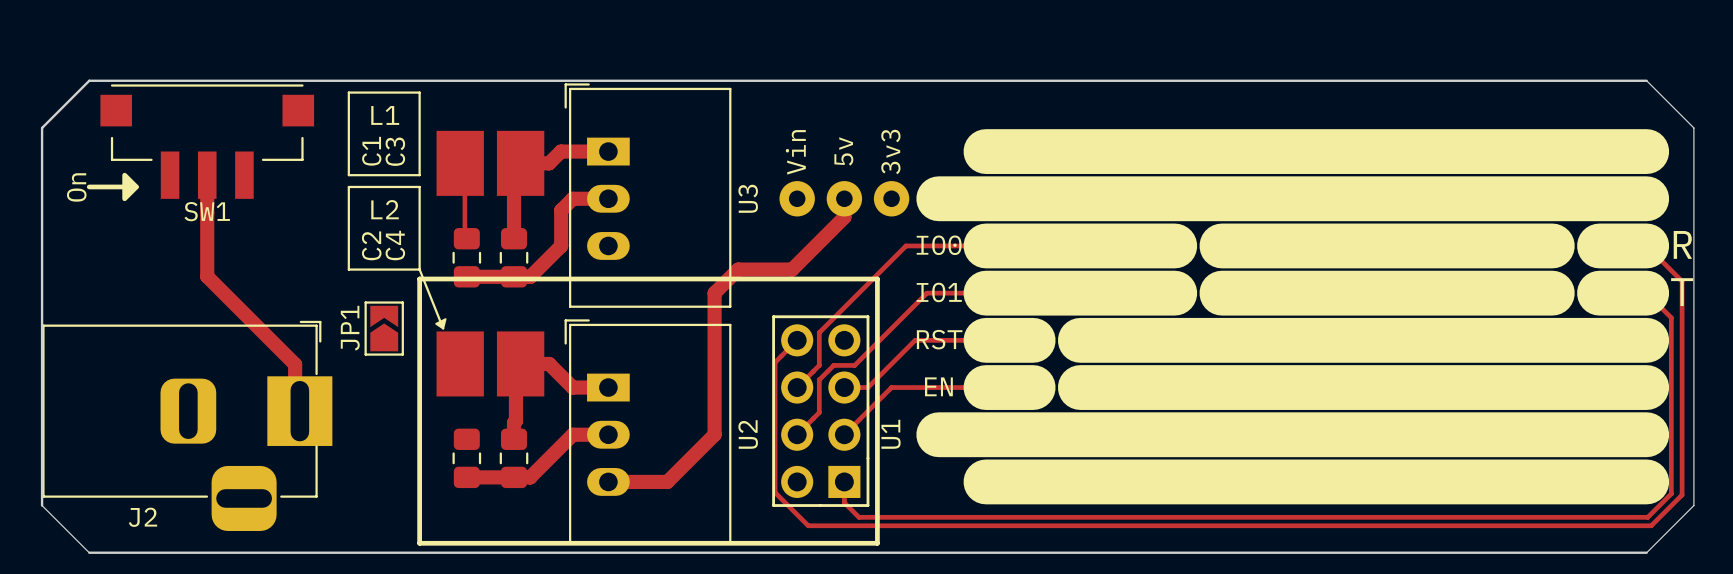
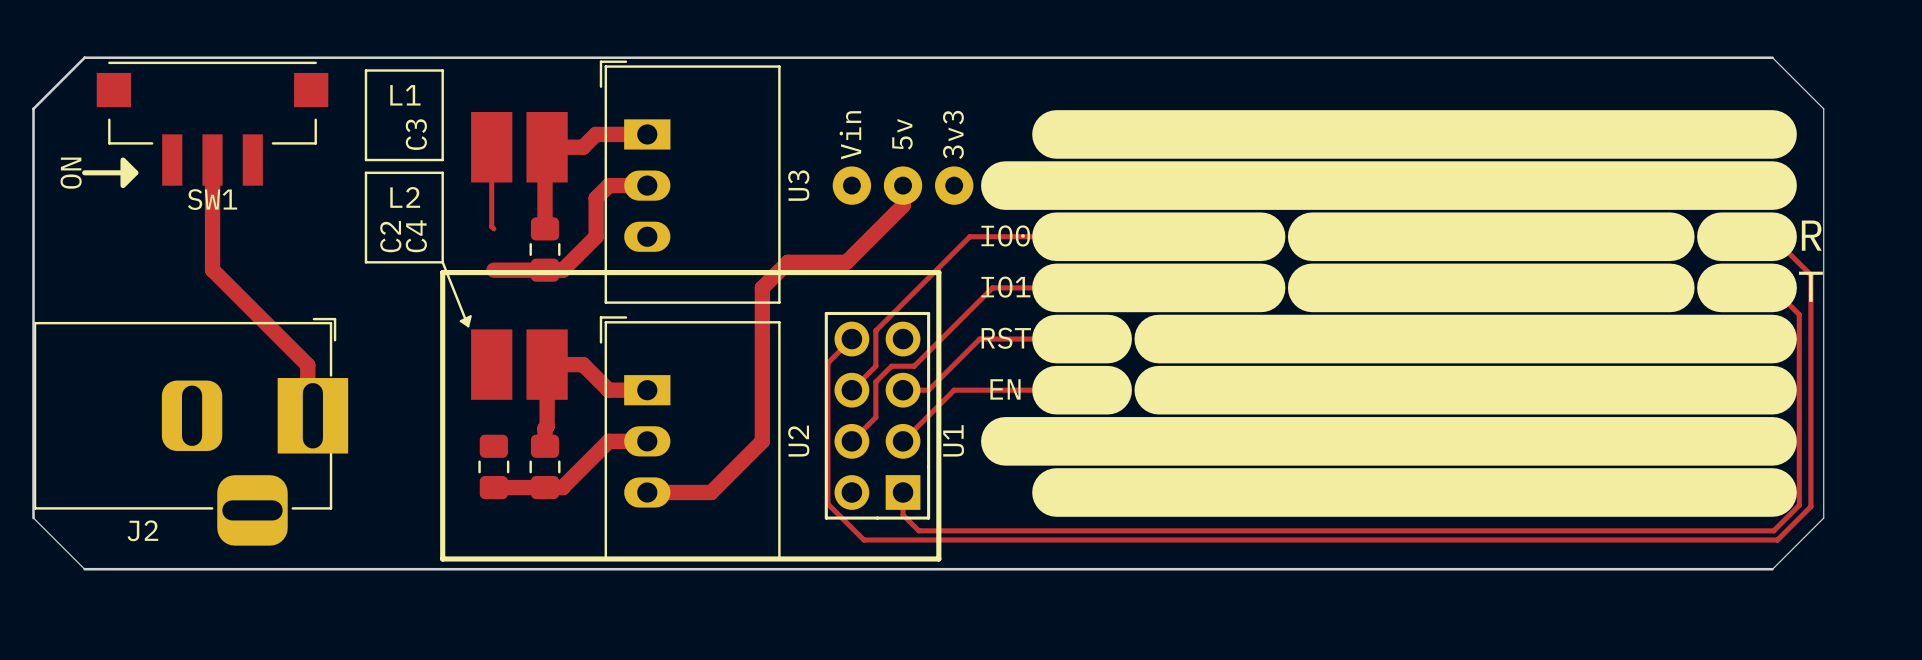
L1 footprint: [436, 130, 545, 196] -> [471, 111, 568, 183]
text: On (76, 187) -> ON (71, 173)
C1: (466, 257) -> none
JP1: (384, 328) -> none
L2 footprint: [436, 331, 545, 397] -> [471, 329, 568, 400]

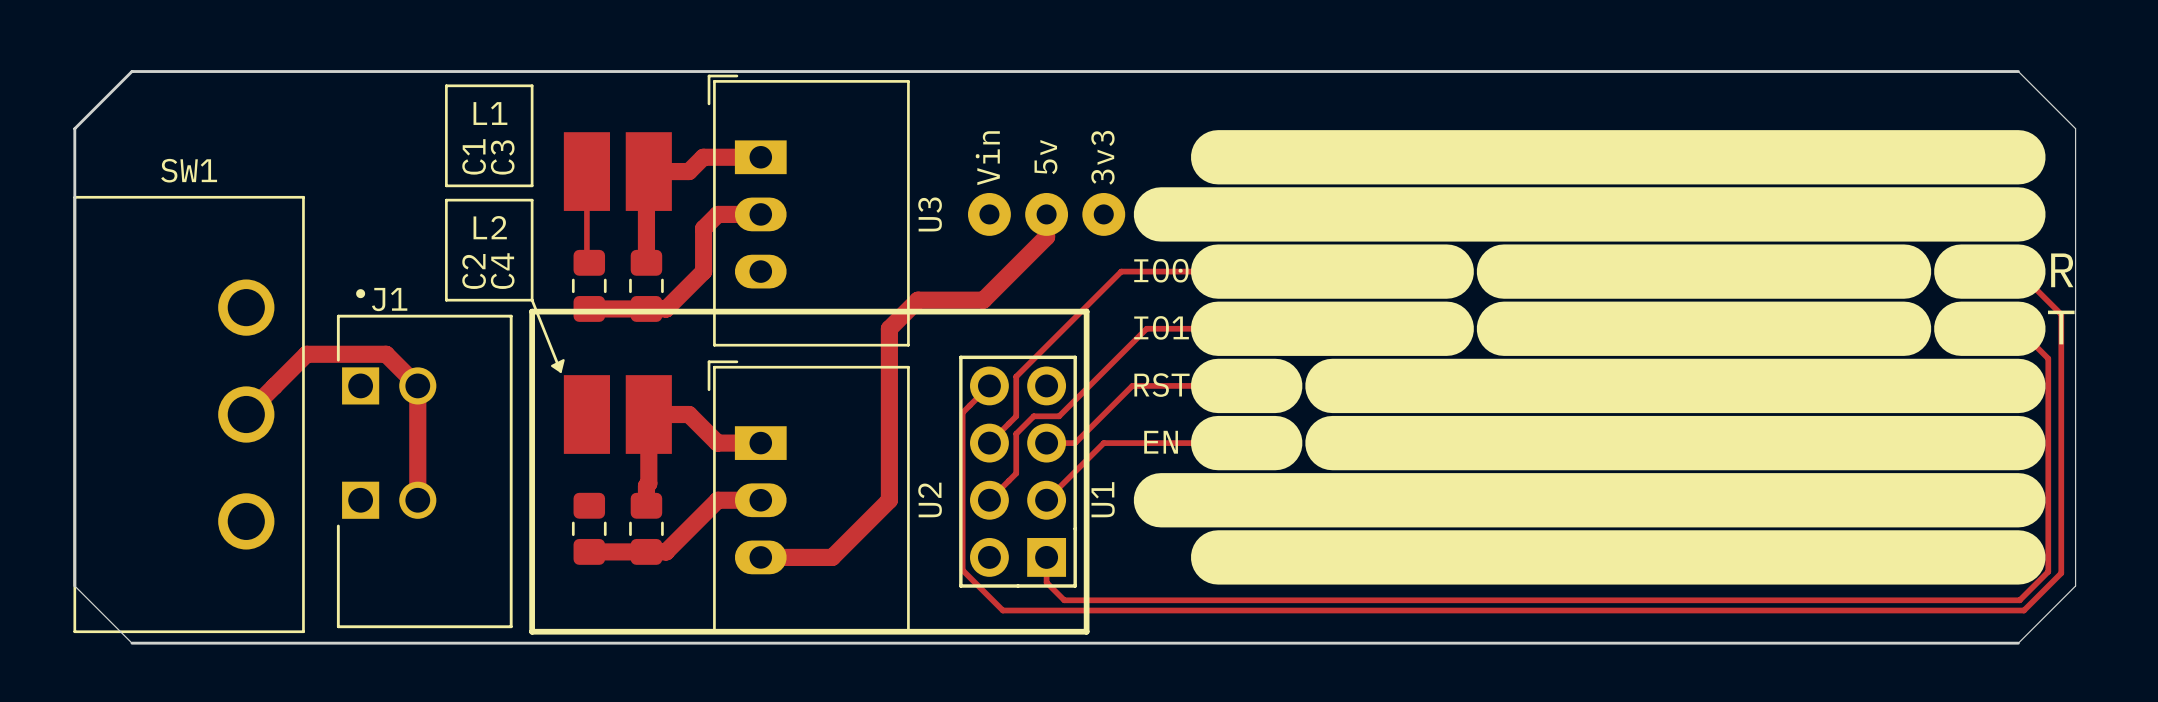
SW1 footprint: [96, 61, 329, 186] -> [73, 195, 305, 634]
drawing: [120, 157, 139, 189] -> none
track: (212, 160) (212, 269) (307, 365) (307, 415) -> none
line: (84, 172) (135, 172) -> none
text: ON (71, 173) -> none
SW1 name position: SW1 (212, 199) -> SW1 (189, 170)
C1: none -> (589, 285)
track: none -> (246, 414) (306, 354) (386, 354) (417, 385) (417, 500)
J1: none -> (424, 458)
J2: (190, 431) -> none

